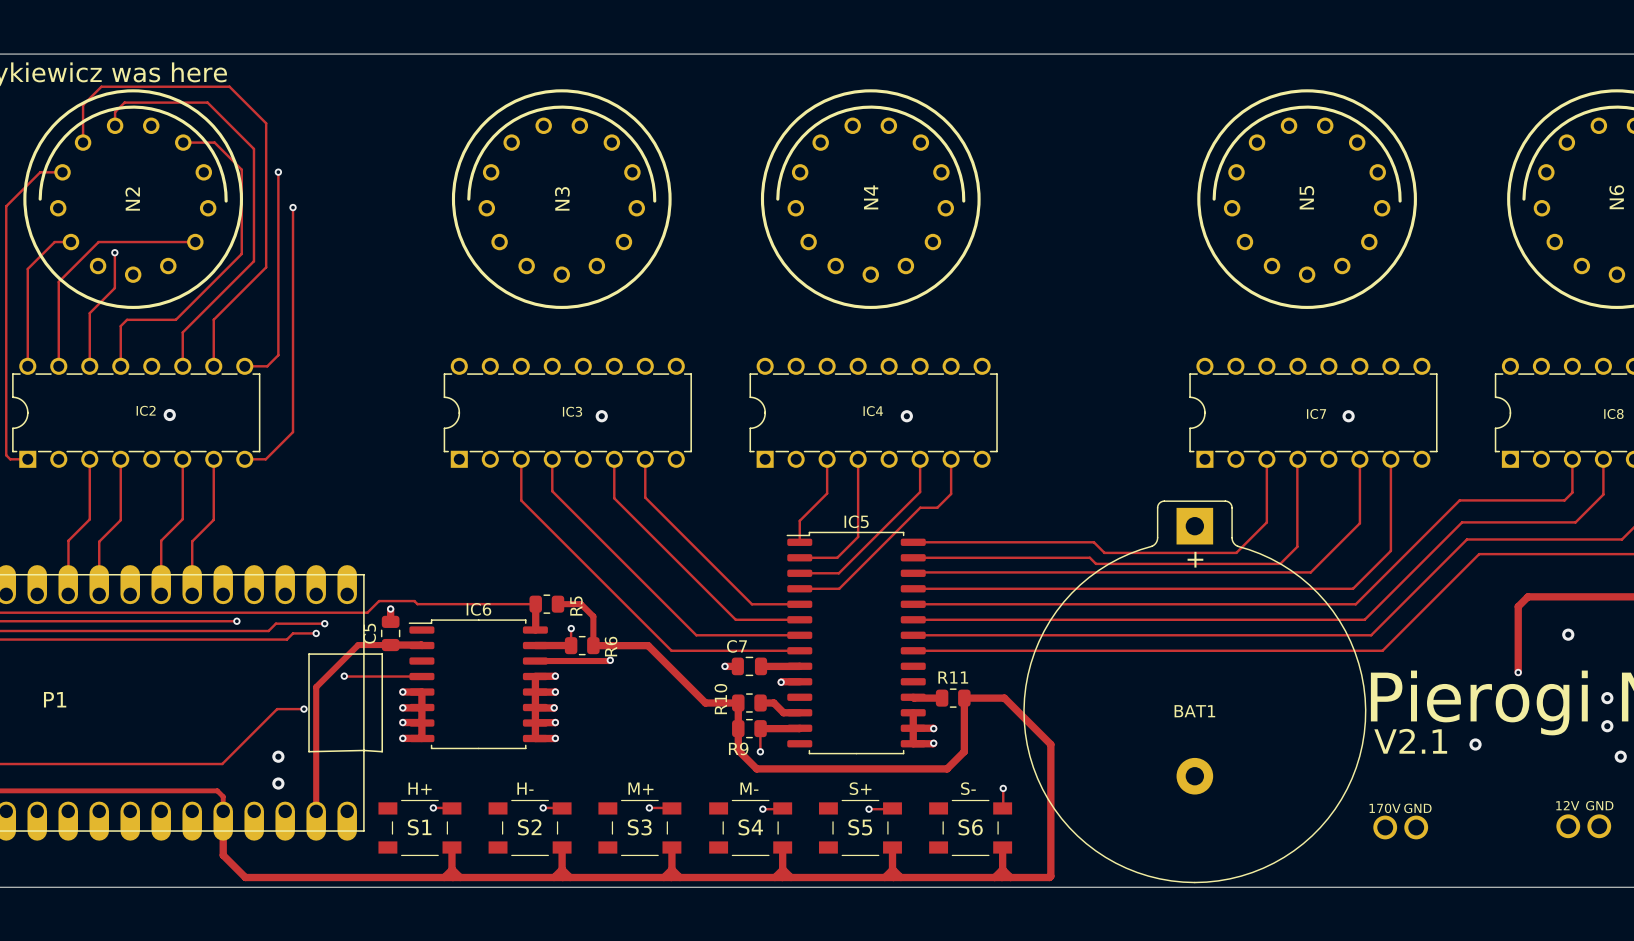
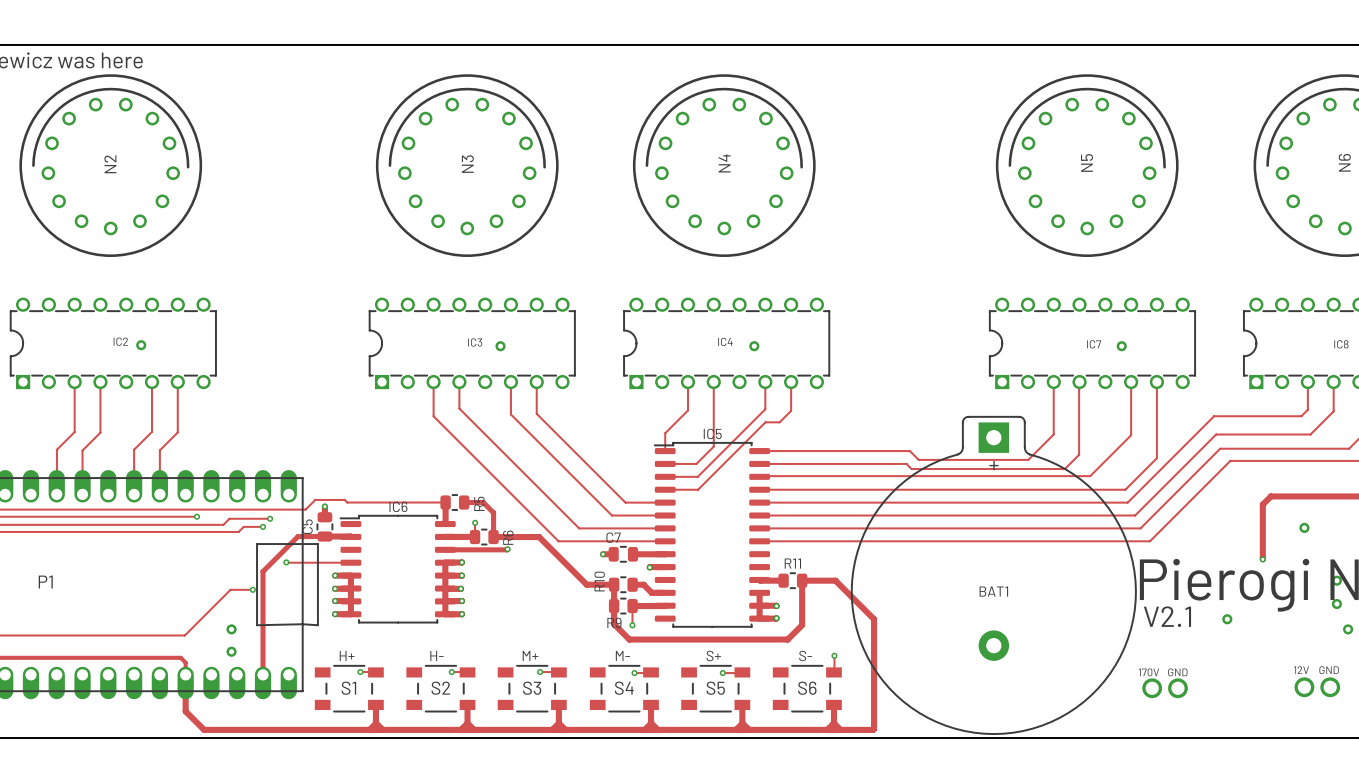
track: (115, 125) (115, 112) (124, 102) (207, 102) (253, 148) (253, 261) (182, 332) (182, 366) -> none
track: (83, 142) (83, 105) (101, 86) (229, 86) (266, 123) (266, 267) (213, 319) (213, 366) -> none
track: (183, 142) (214, 142) (241, 169) (241, 253) (175, 319) (127, 319) (120, 326) (120, 366) -> none
track: (62, 172) (40, 172) (6, 206) (6, 455) (10, 459) (27, 459) -> none
track: (278, 172) (278, 355) (267, 366) (244, 366) -> none
via: (278, 172) -> none
track: (293, 207) (293, 432) (265, 459) (244, 459) -> none
via: (293, 207) -> none
track: (71, 242) (54, 242) (27, 269) (27, 366) -> none
track: (195, 242) (98, 242) (58, 281) (58, 366) -> none
track: (114, 252) (114, 288) (89, 313) (89, 366) -> none
via: (114, 252) -> none

